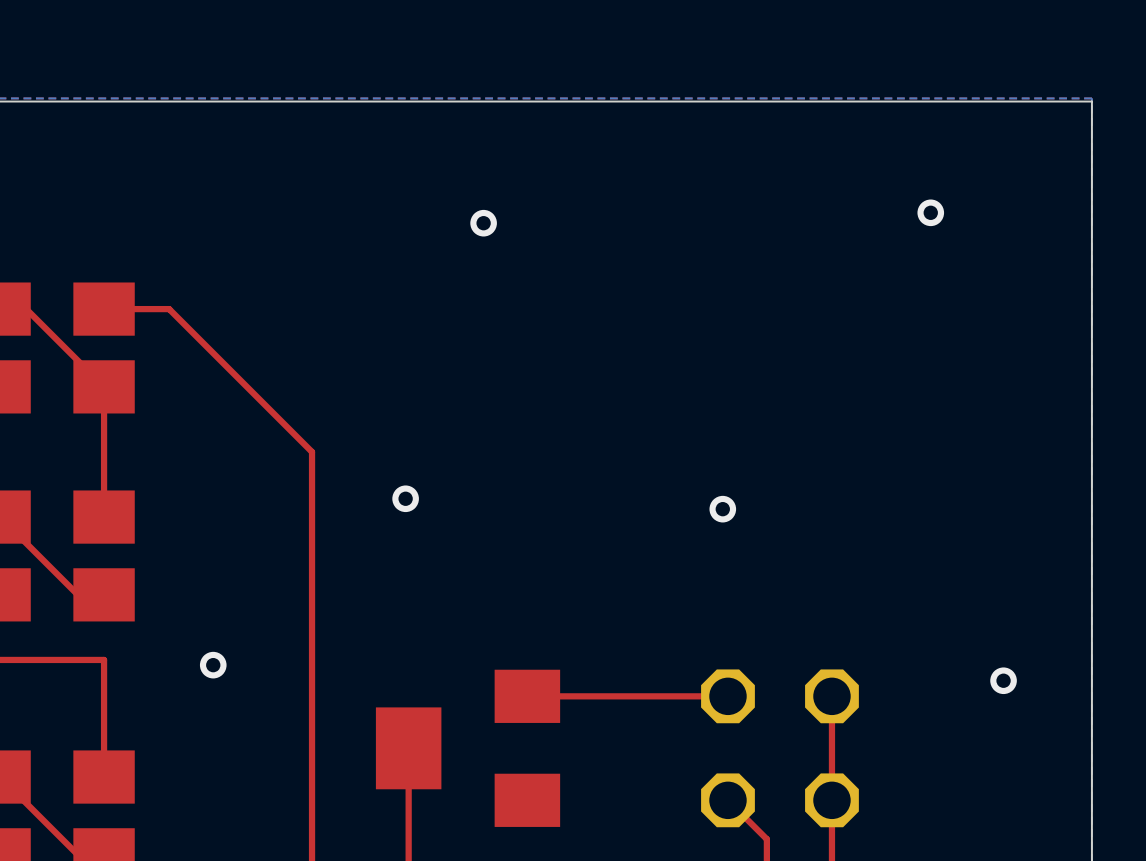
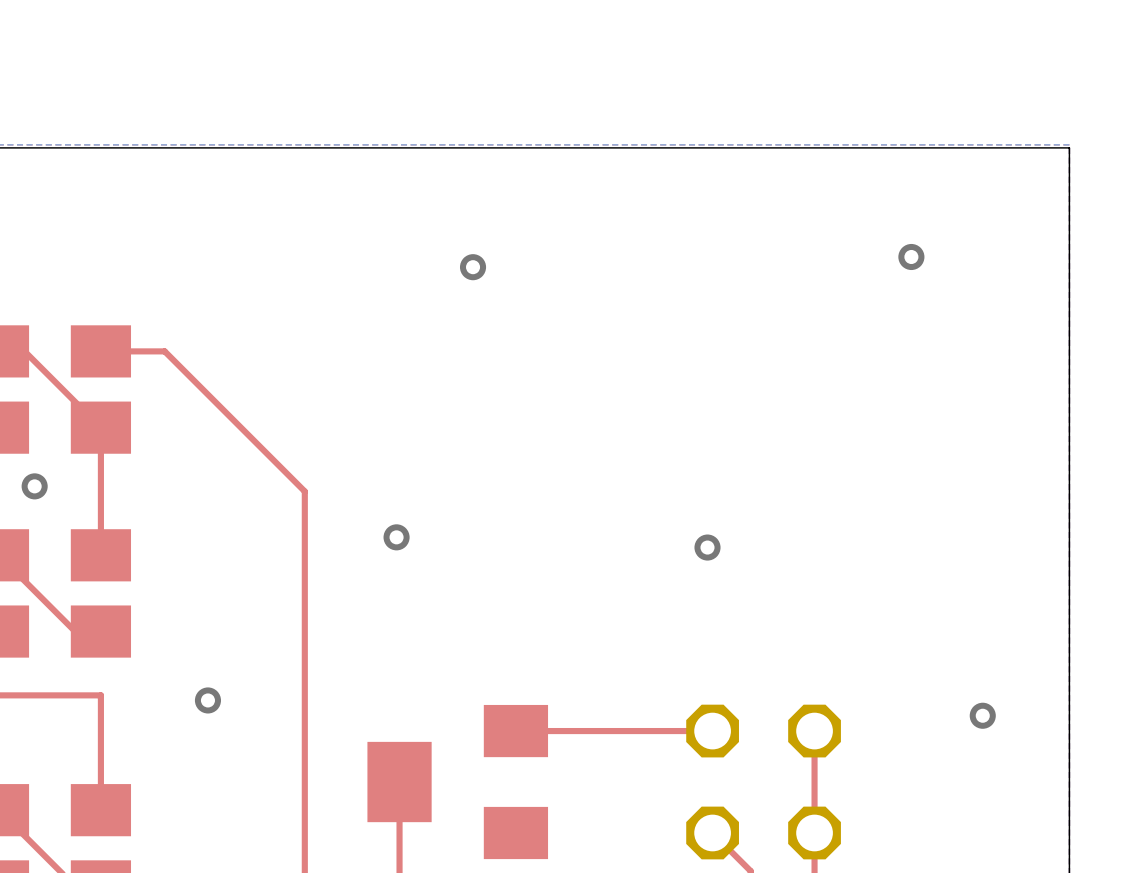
via: none -> (34, 486)

